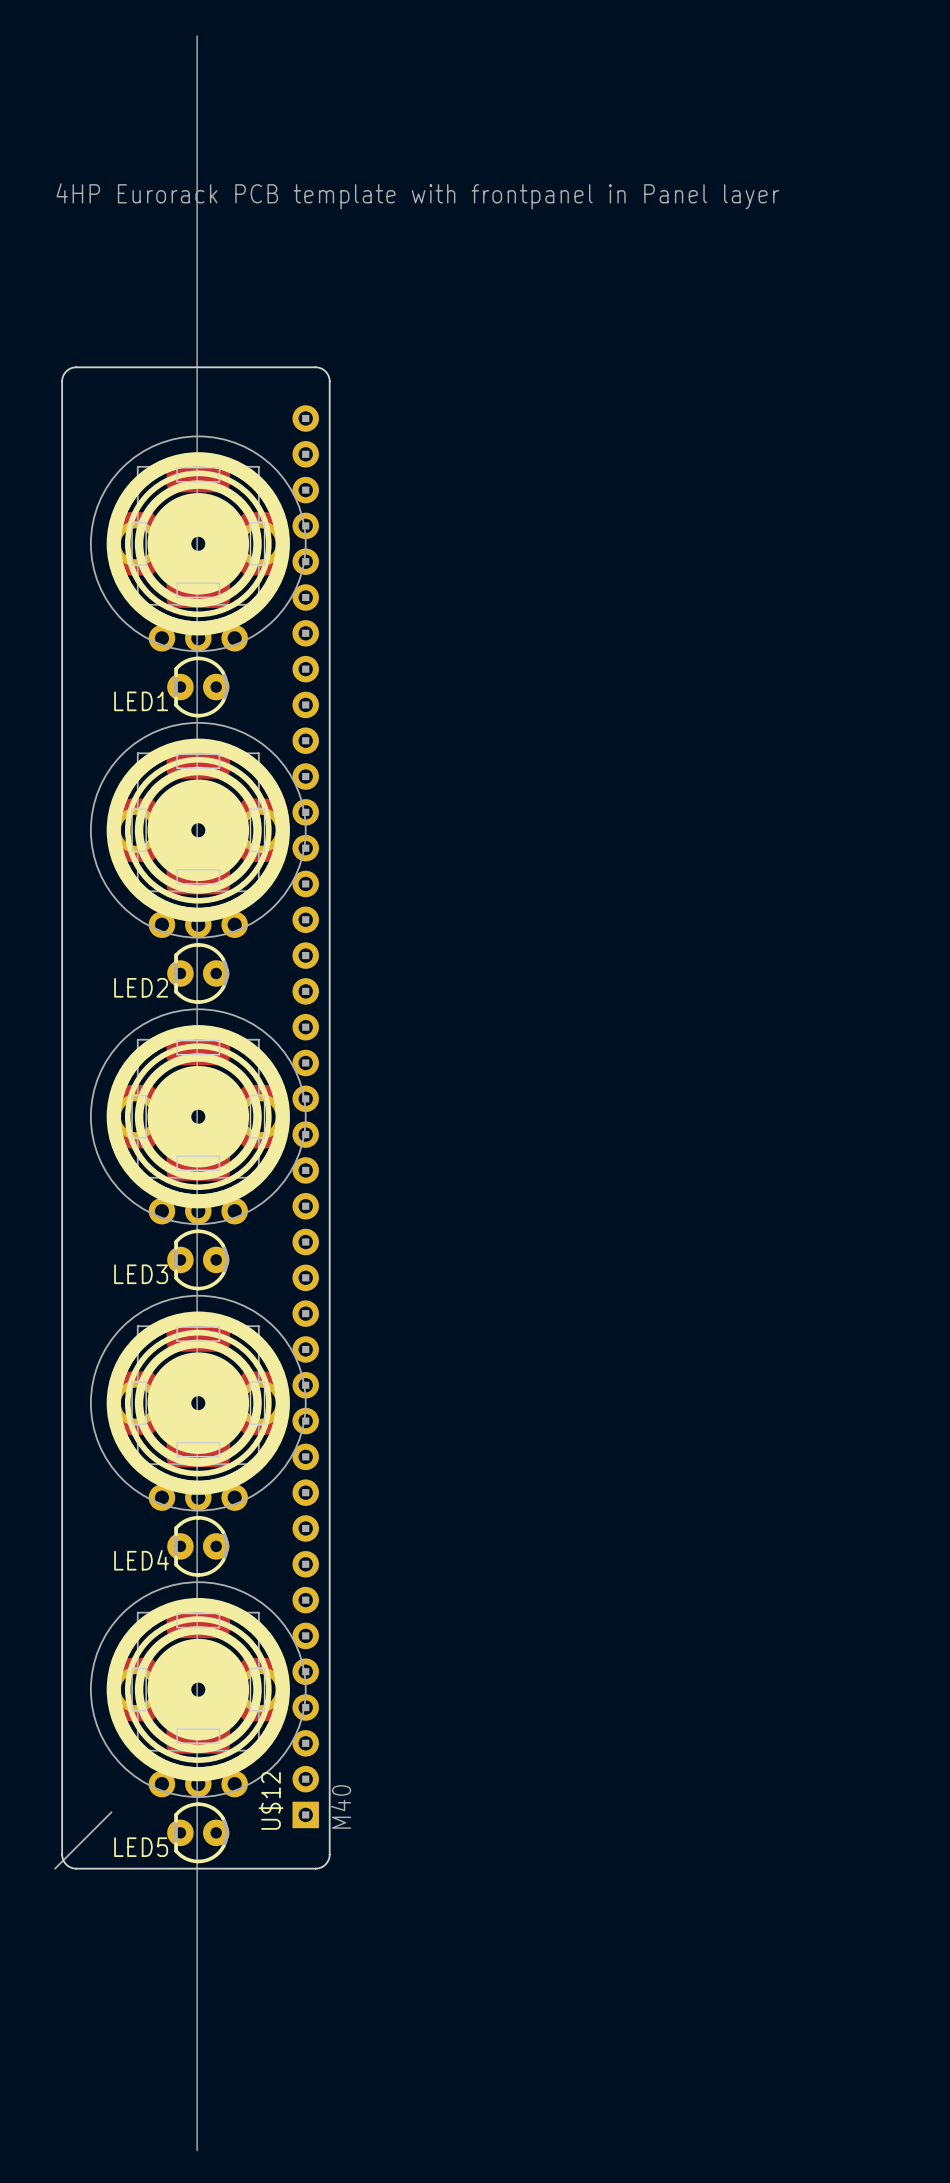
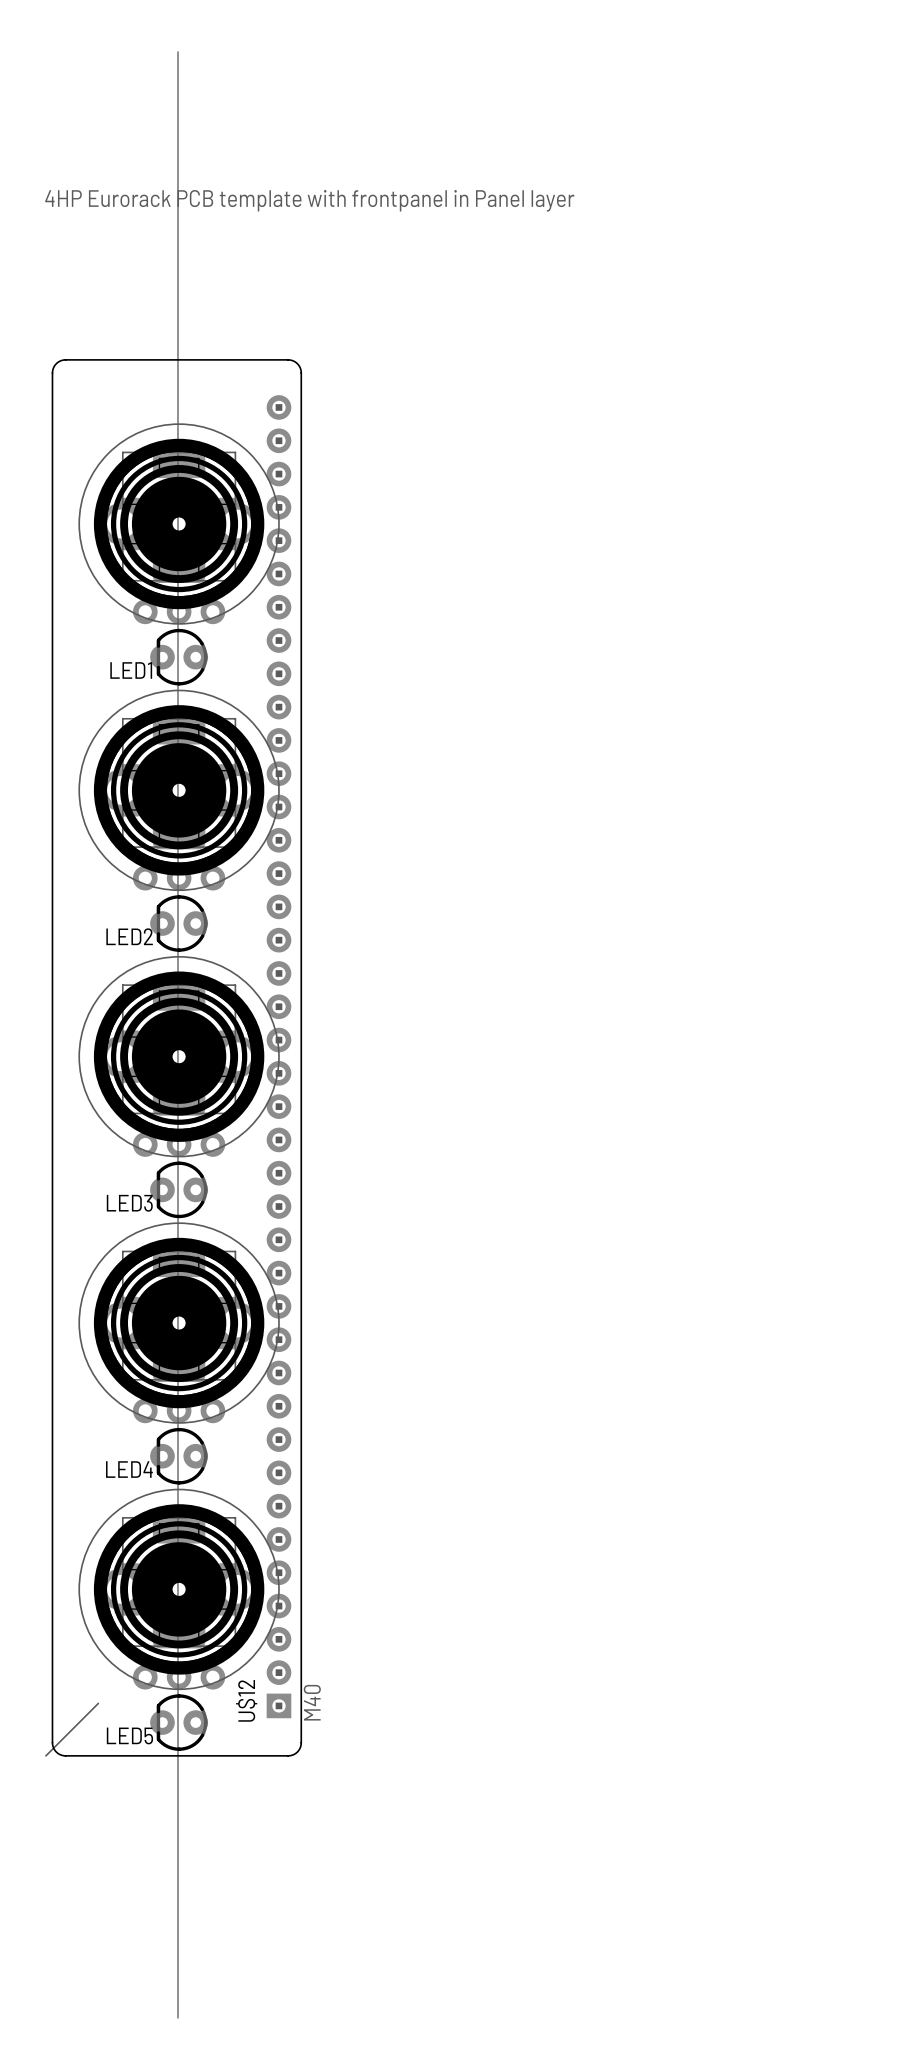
part footprint: [89, 435, 307, 653] -> [78, 423, 280, 625]
part footprint: [89, 721, 307, 939] -> [78, 689, 280, 892]
part footprint: [89, 1008, 307, 1226] -> [78, 955, 280, 1158]
part footprint: [89, 1294, 307, 1512] -> [78, 1222, 280, 1424]
part footprint: [89, 1581, 307, 1798] -> [78, 1488, 280, 1691]

